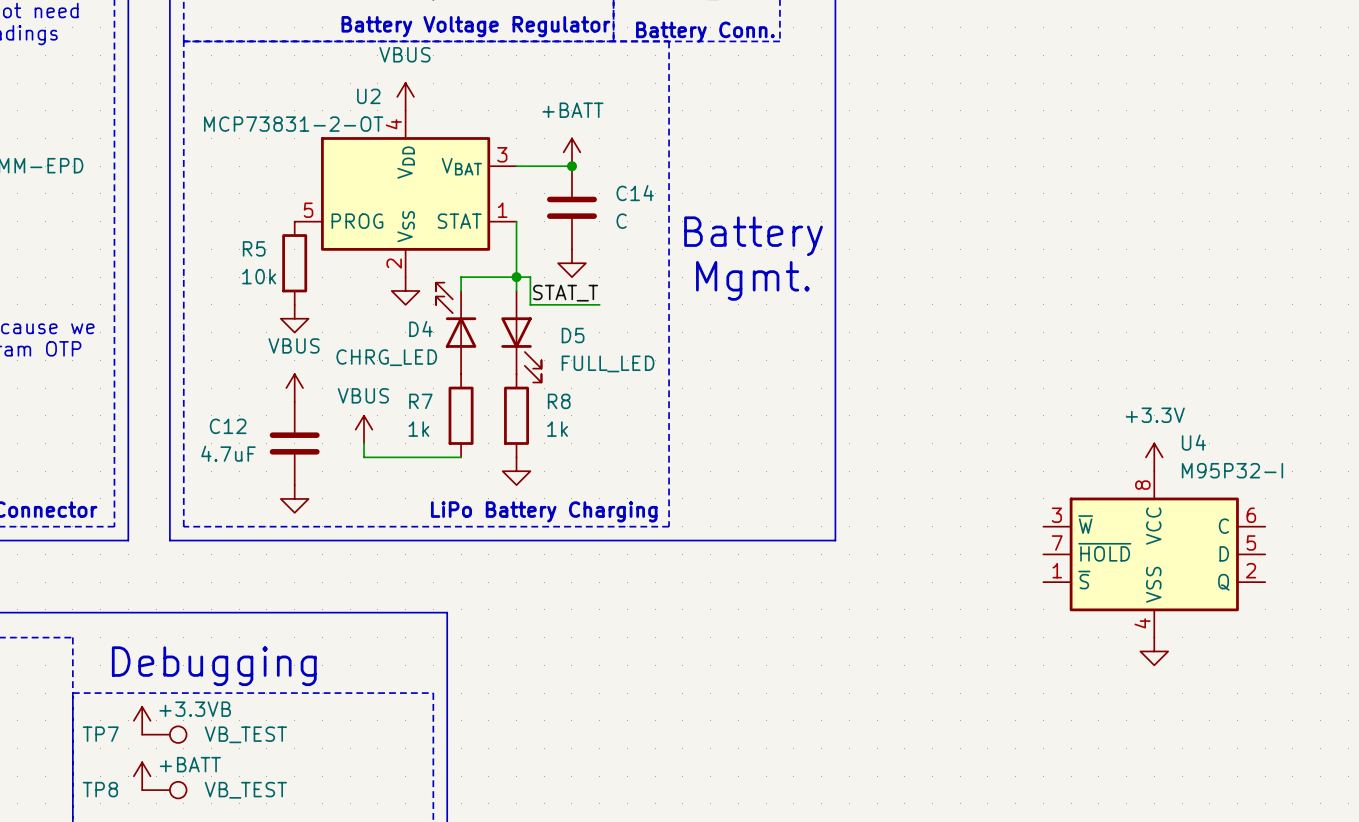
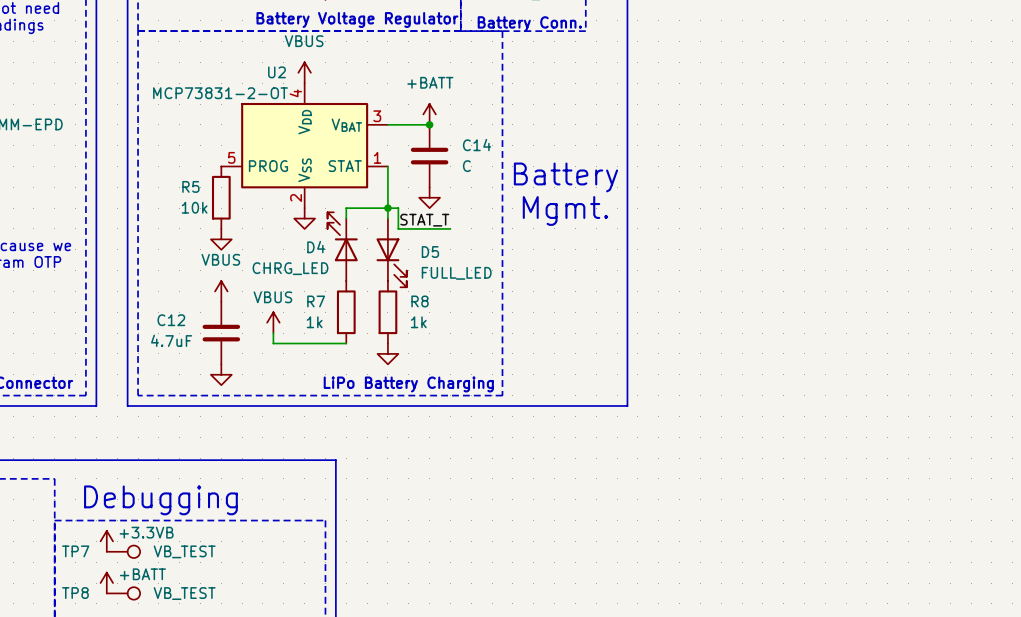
power symbol: +3.3V (1154, 457) -> none
U4: M95P32-I (1154, 554) -> none
power symbol: (1154, 651) -> none

